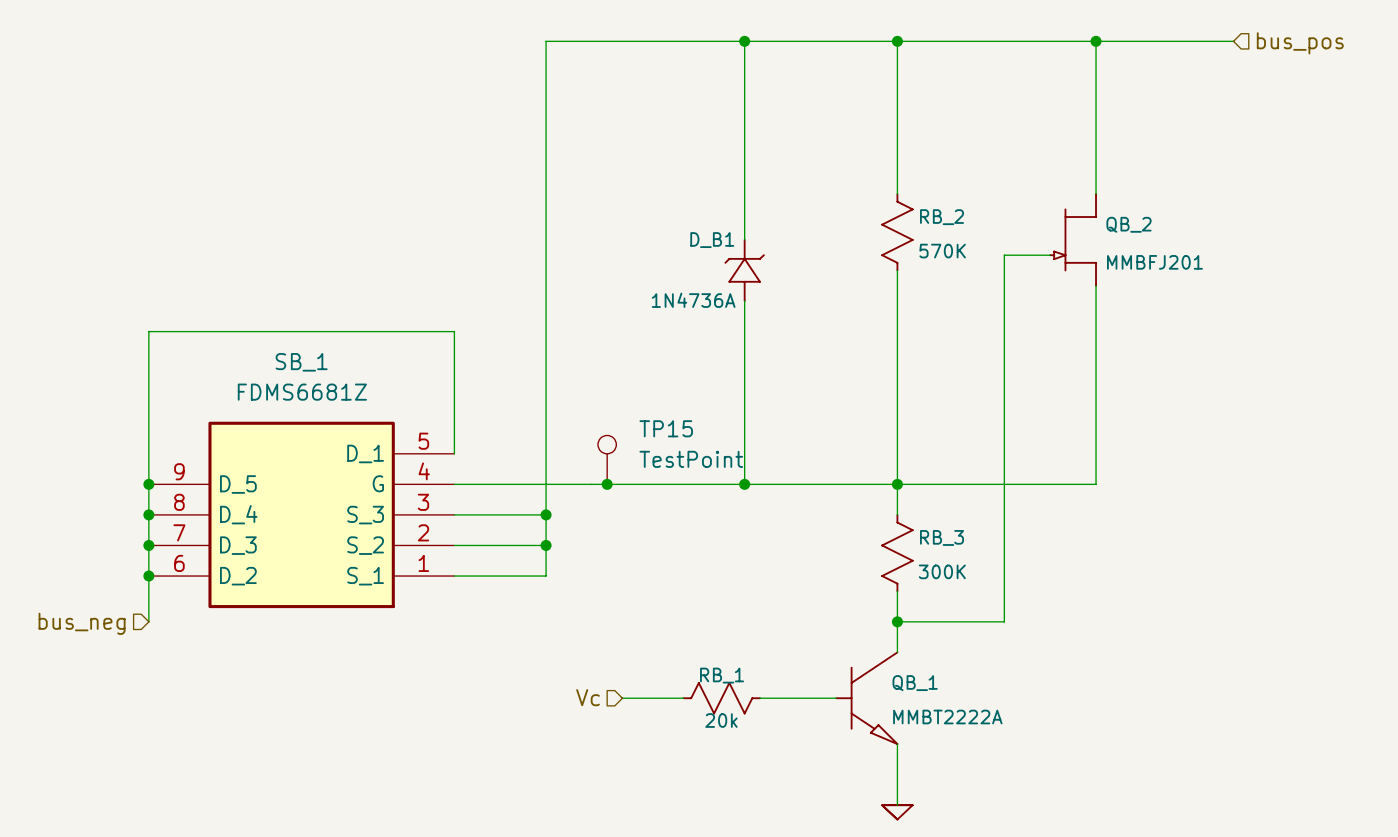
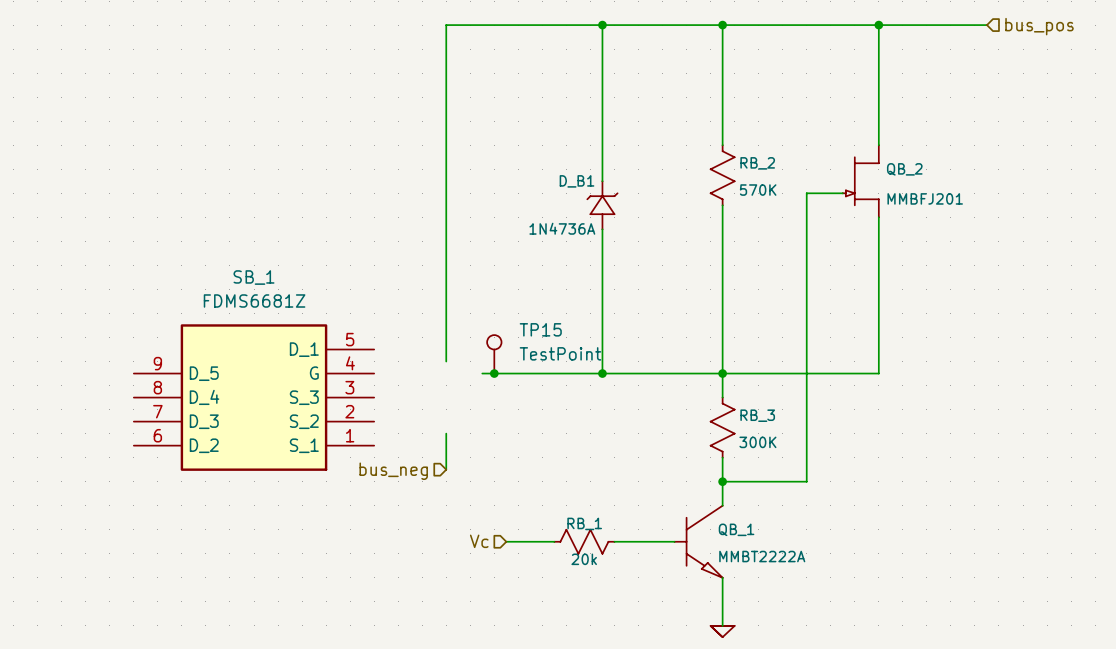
wire: (454, 453) (454, 331) (148, 331) (148, 621) -> none
wire: (546, 469) (546, 560) -> none
junction: (148, 484) -> none
wire: (454, 484) (591, 484) -> none
junction: (148, 514) -> none
wire: (454, 514) (546, 514) -> none
junction: (546, 514) -> none
junction: (148, 545) -> none
wire: (454, 545) (546, 545) -> none
junction: (546, 545) -> none
junction: (148, 576) -> none
wire: (454, 576) (546, 576) -> (446, 469) (446, 445)
hierarchical label: none -> bus_neg (393, 471)
hierarchical label: bus_neg (82, 623) -> none

